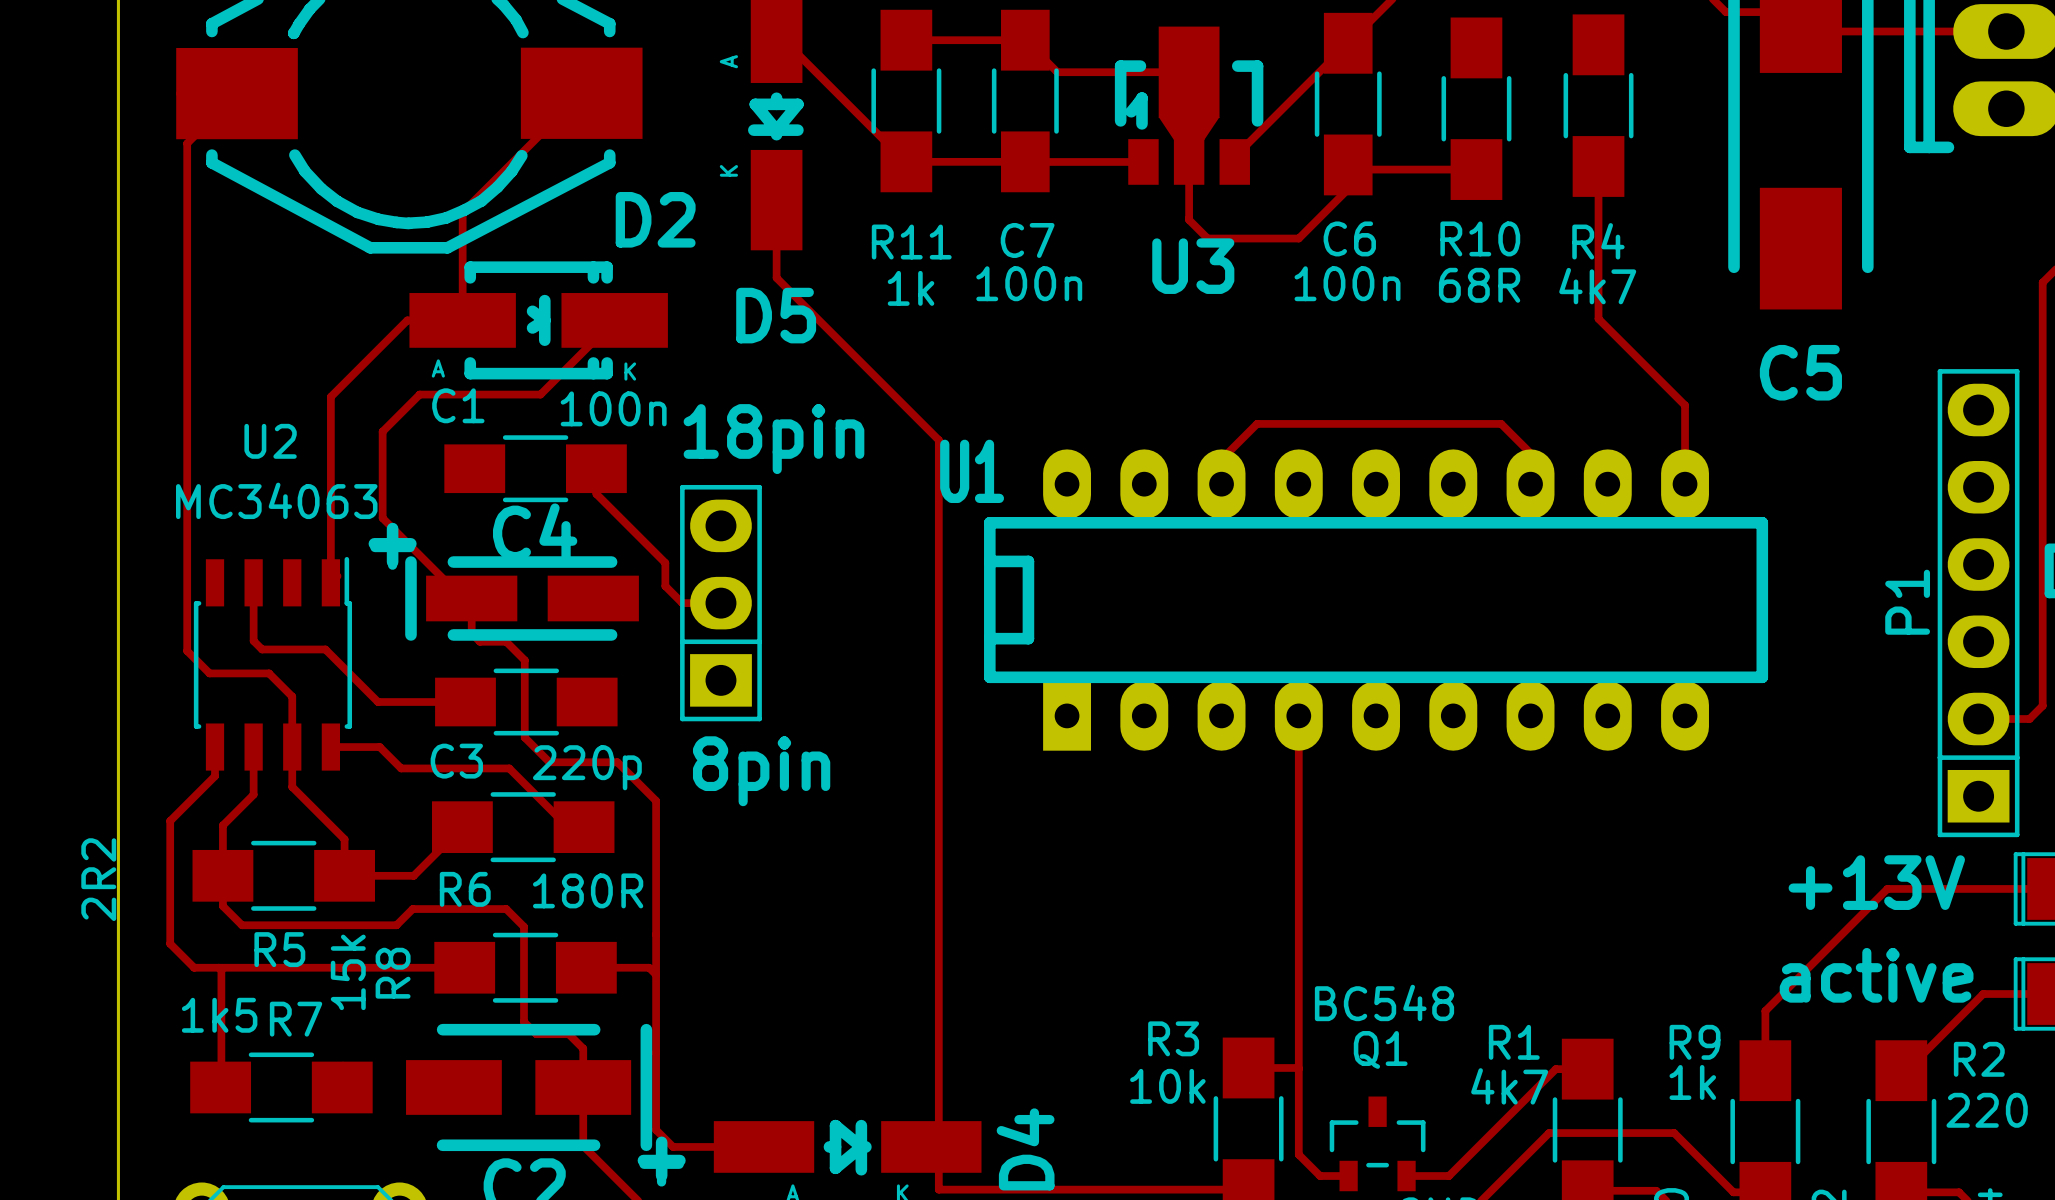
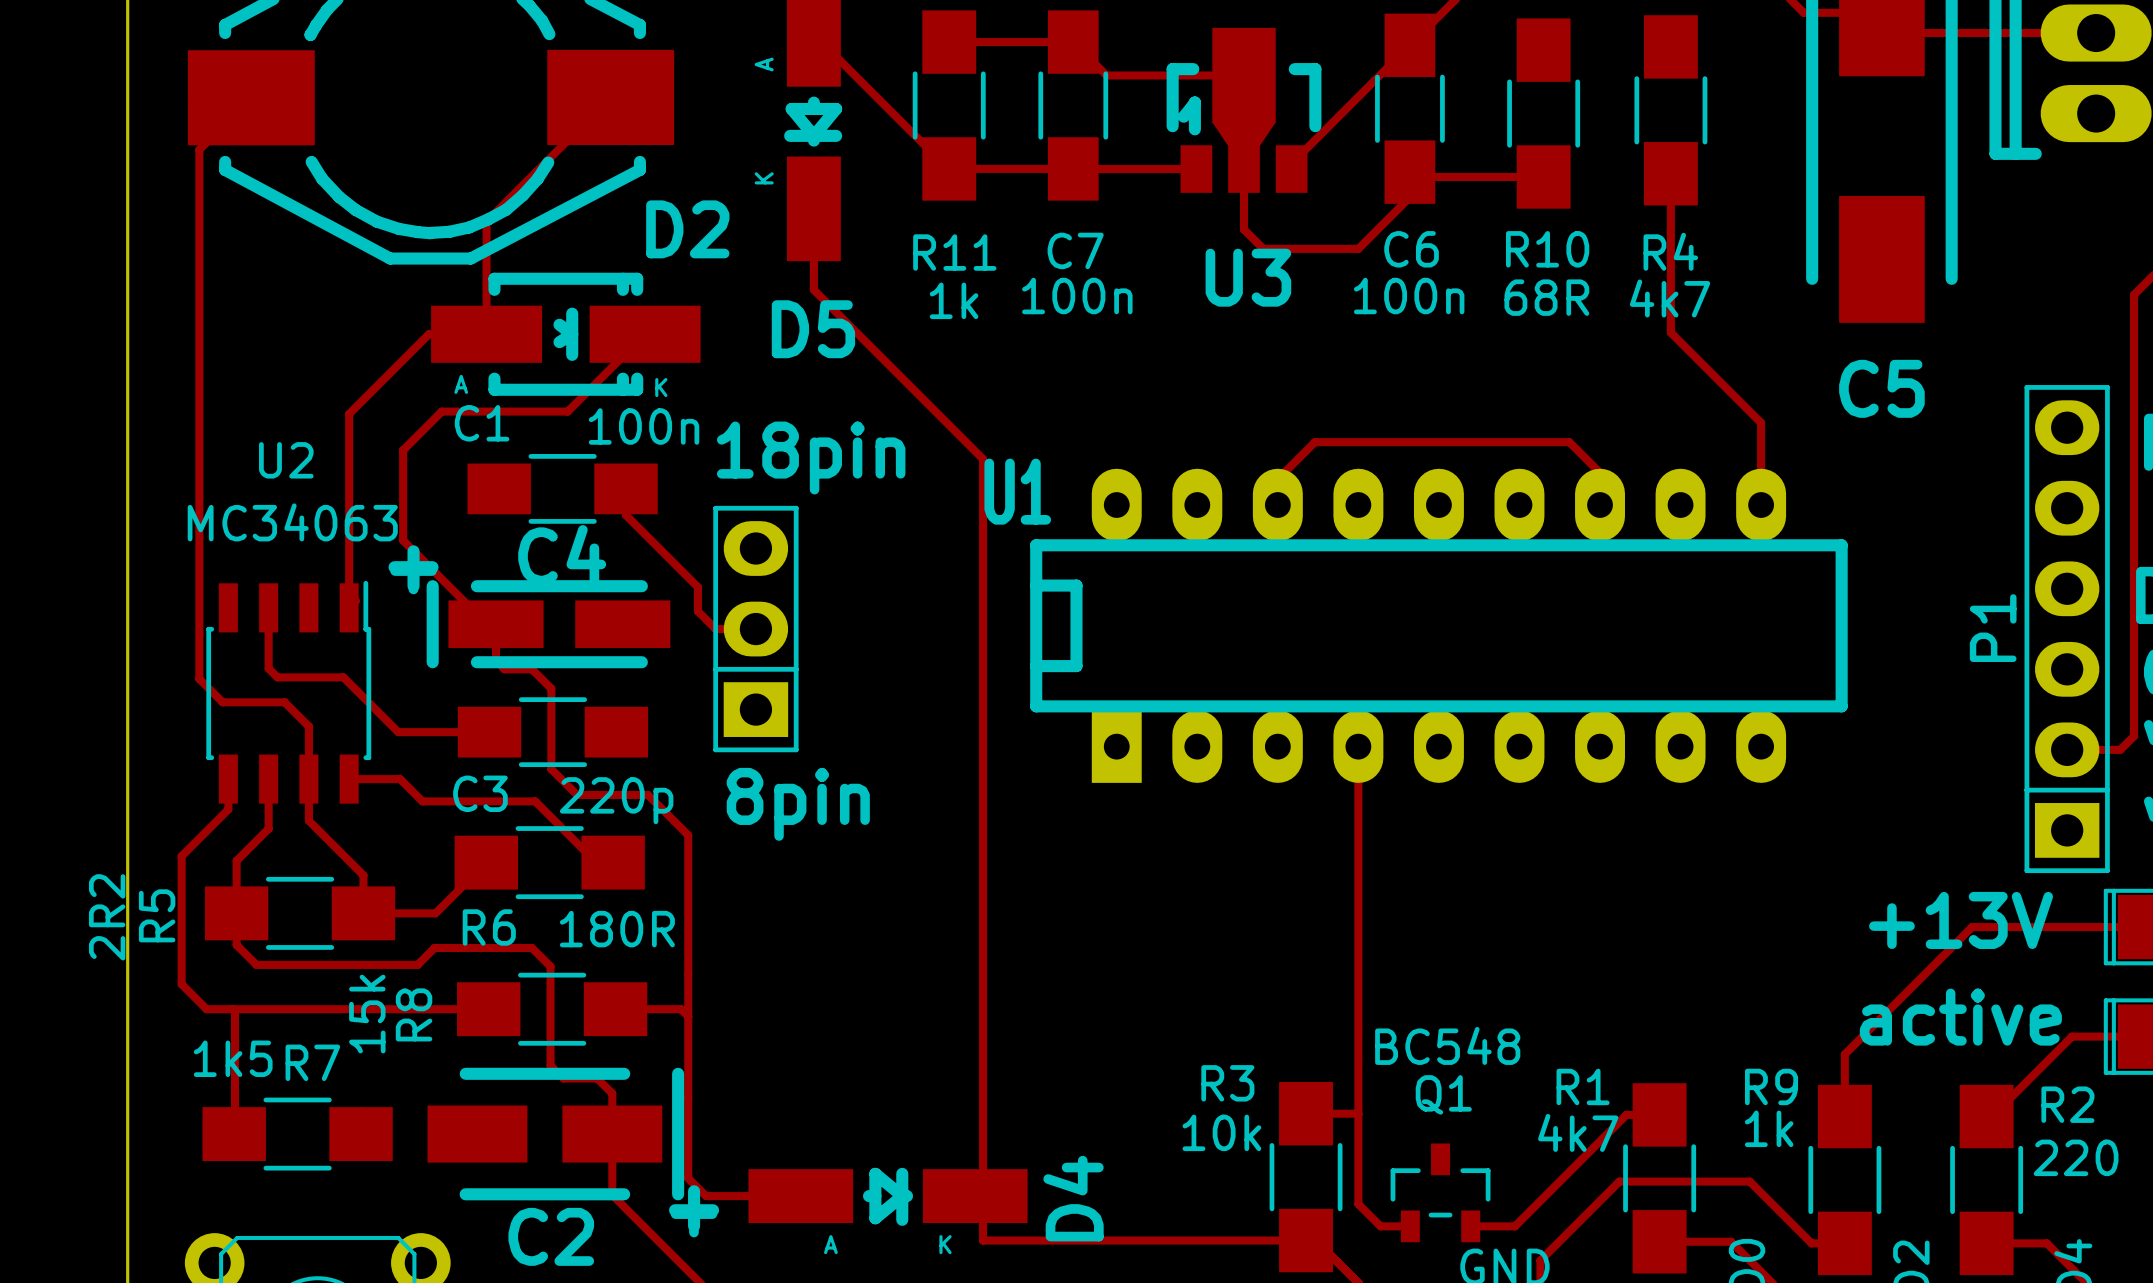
R5 name rotation: 0° (279, 949) -> 90° counterclockwise (157, 915)
R5 name position: R5 (279, 949) -> R5 (157, 915)

